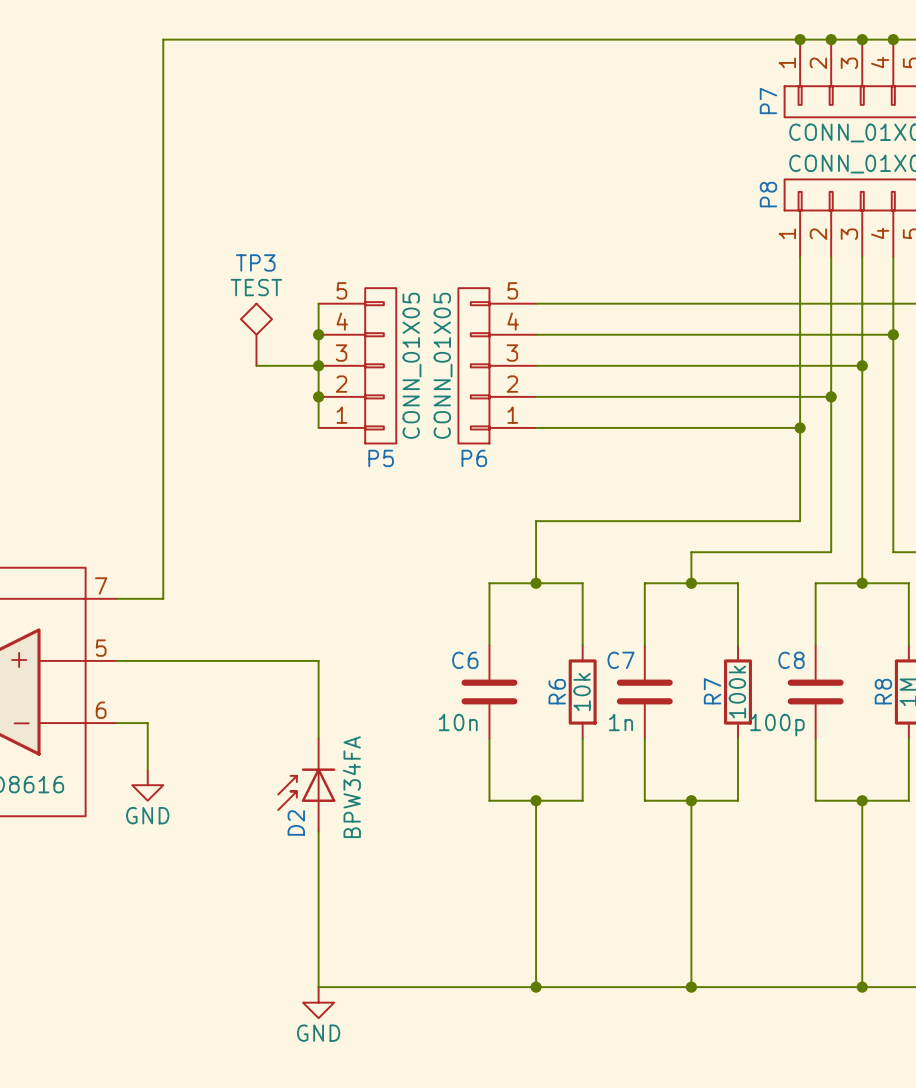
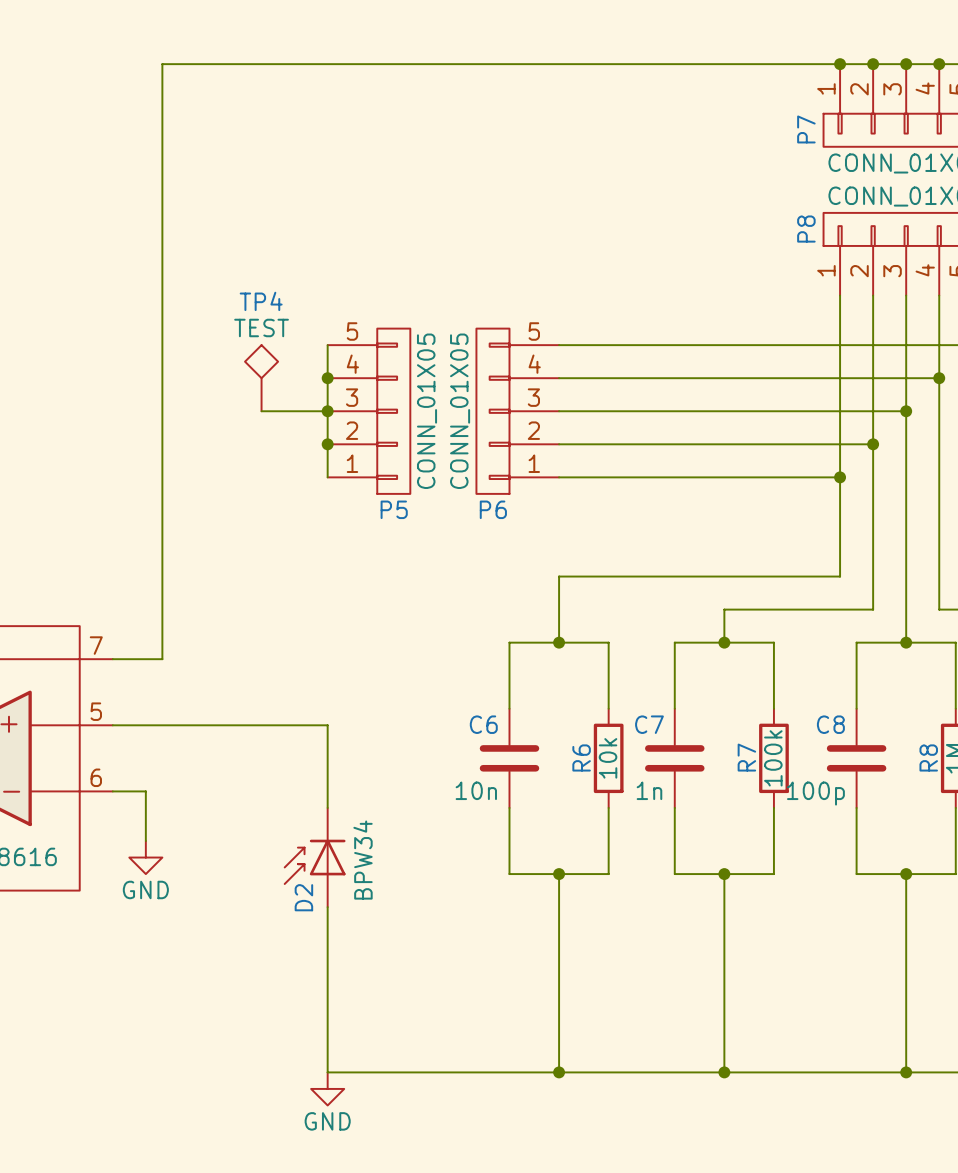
TP3 name: TP3 (255, 262) -> TP4 (261, 301)
D2 value: BPW34FA (351, 787) -> BPW34 (363, 860)

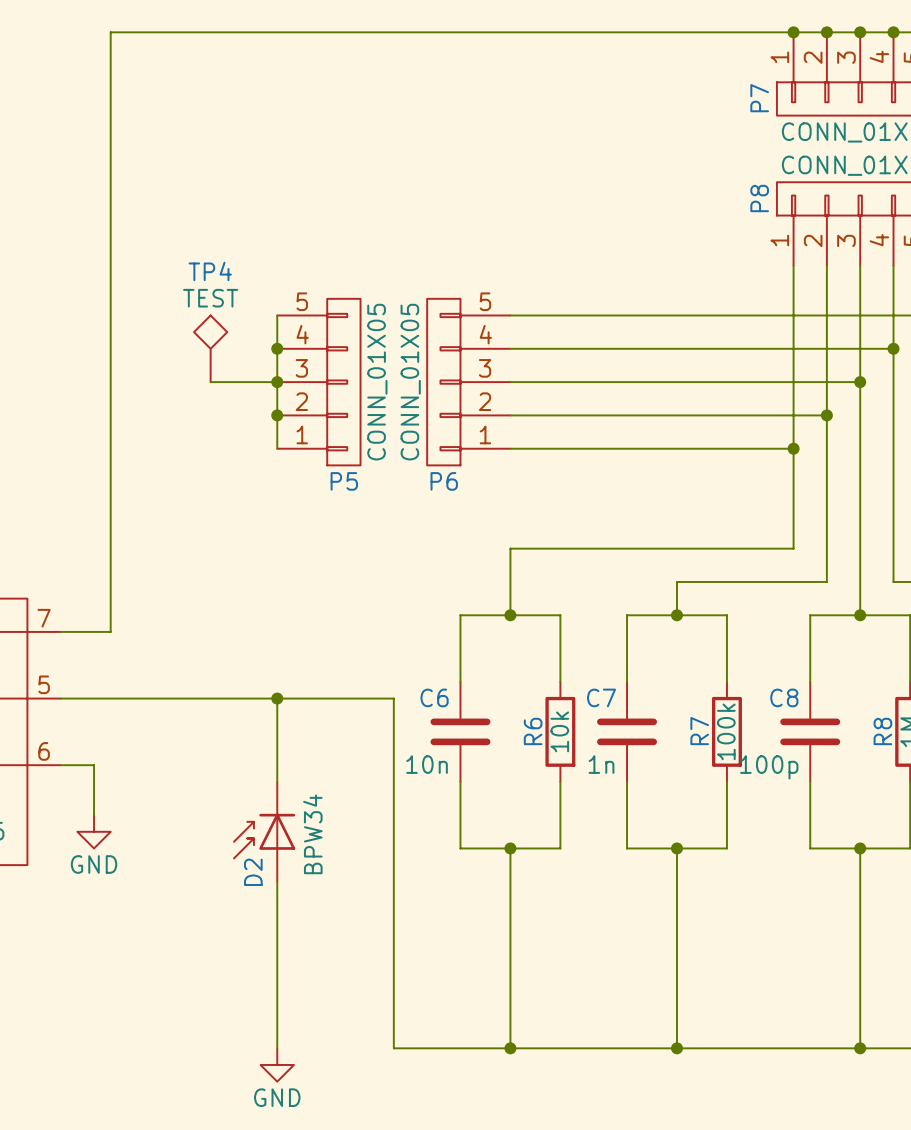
junction: none -> (277, 698)
wire: (327, 1072) (443, 1072) -> (277, 698) (393, 698) (393, 1048)

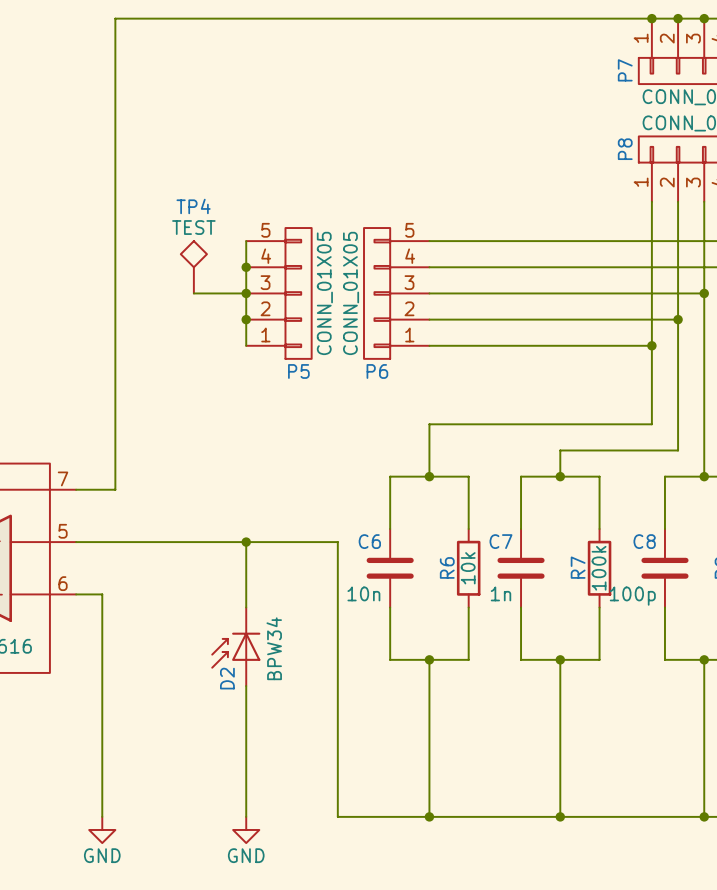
wire: none -> (102, 633) (102, 816)
power symbol position: GND (94, 831) -> GND (102, 829)

